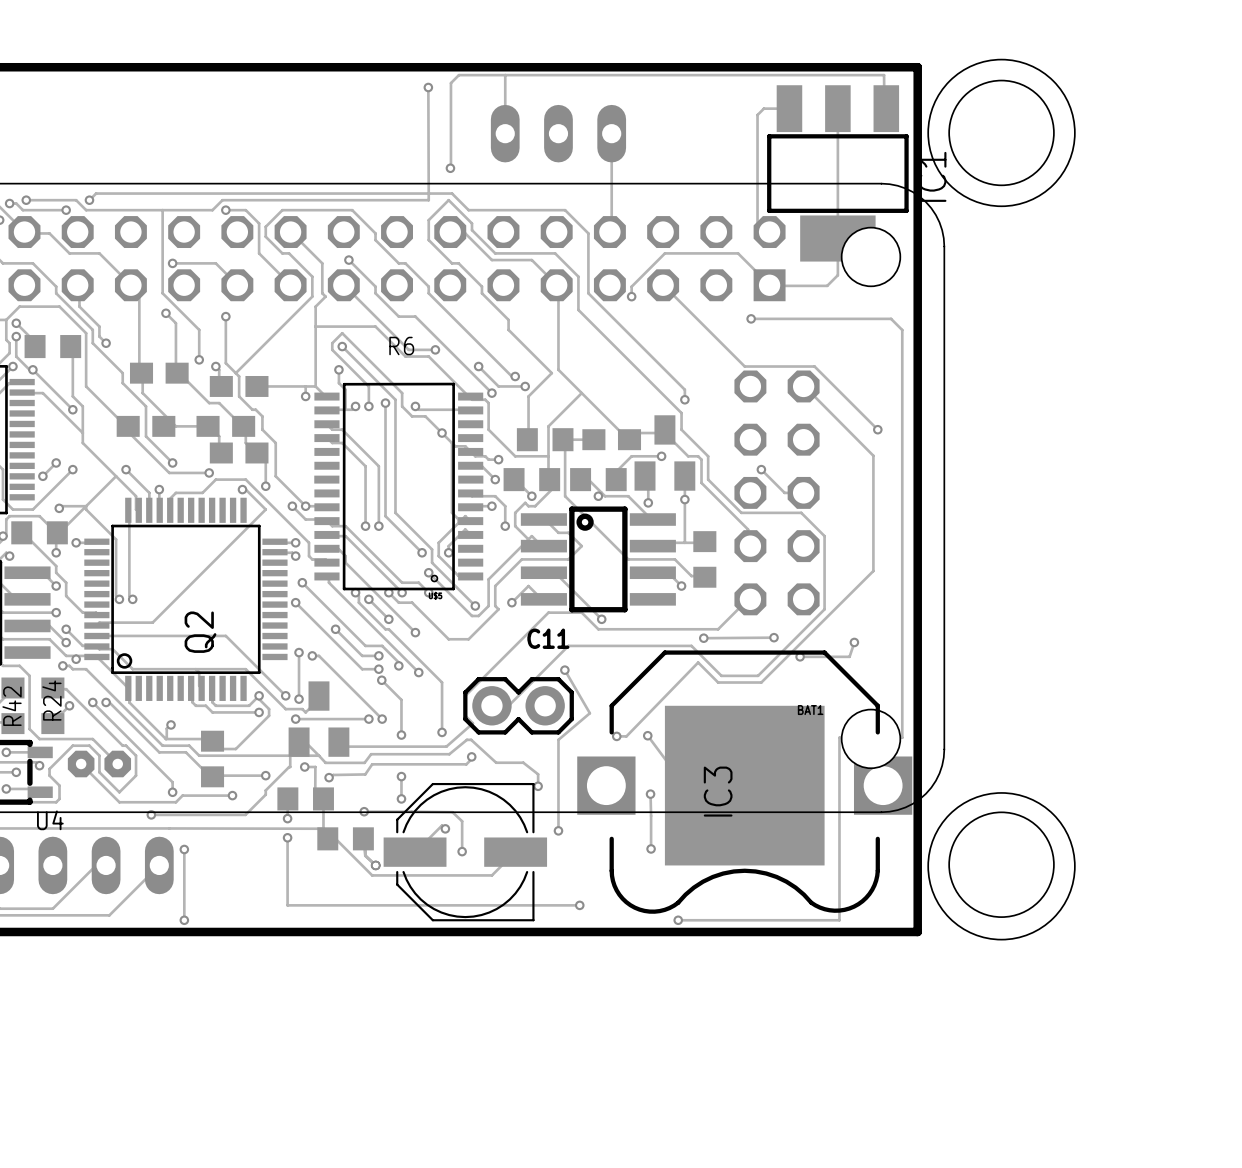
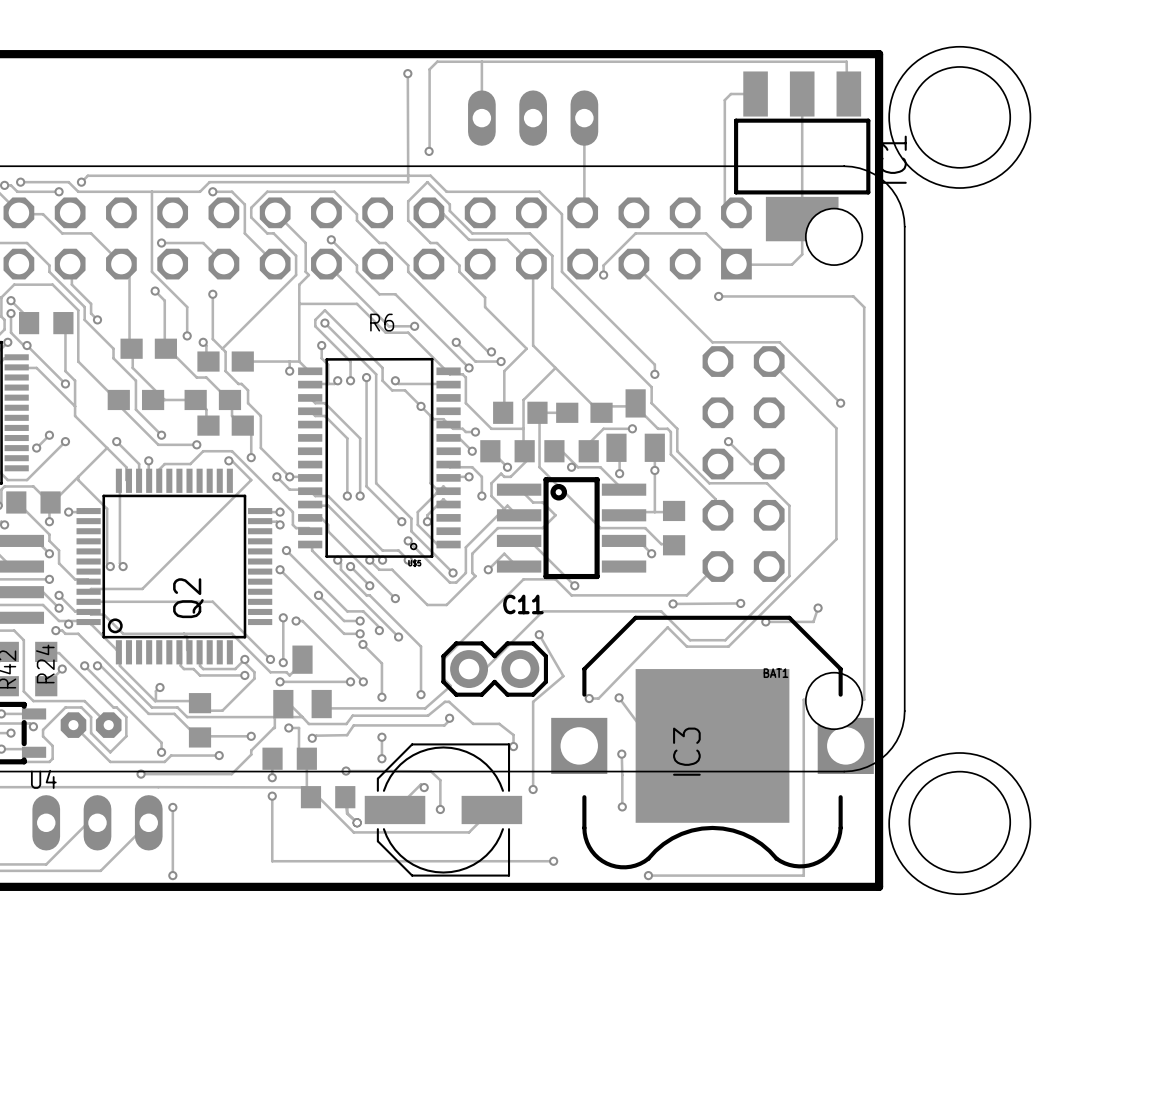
track: (86, 506) (57, 506) (59, 508) -> none
via: (59, 508) -> none

